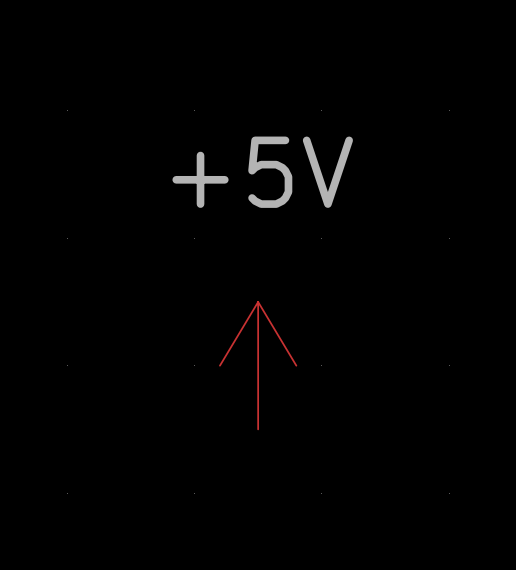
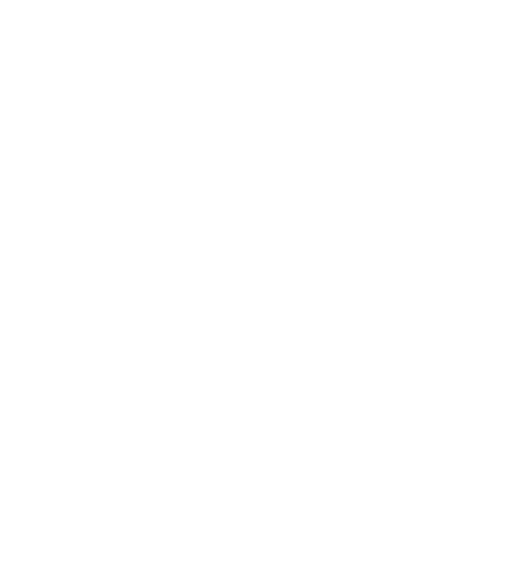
power symbol: +5V (258, 365) -> none

